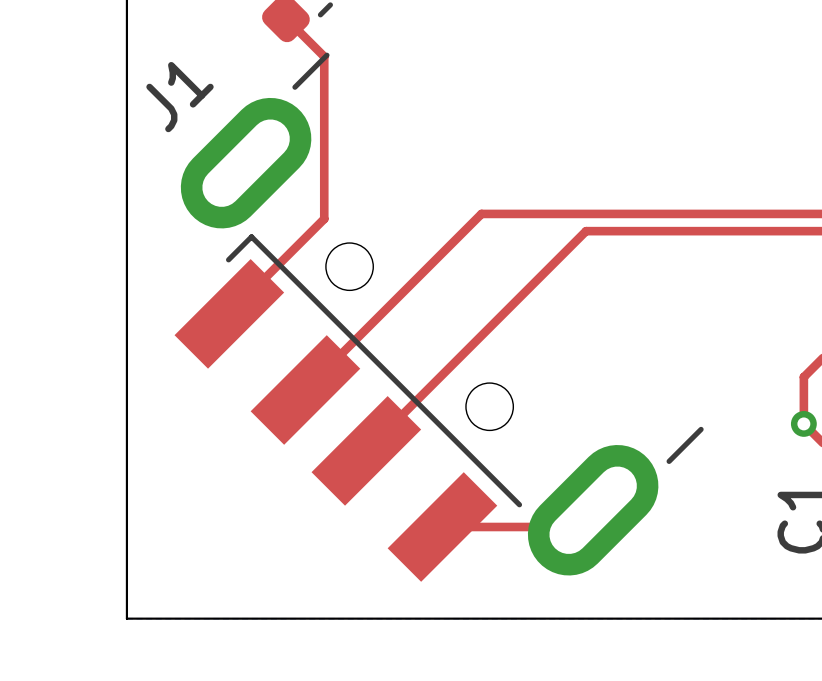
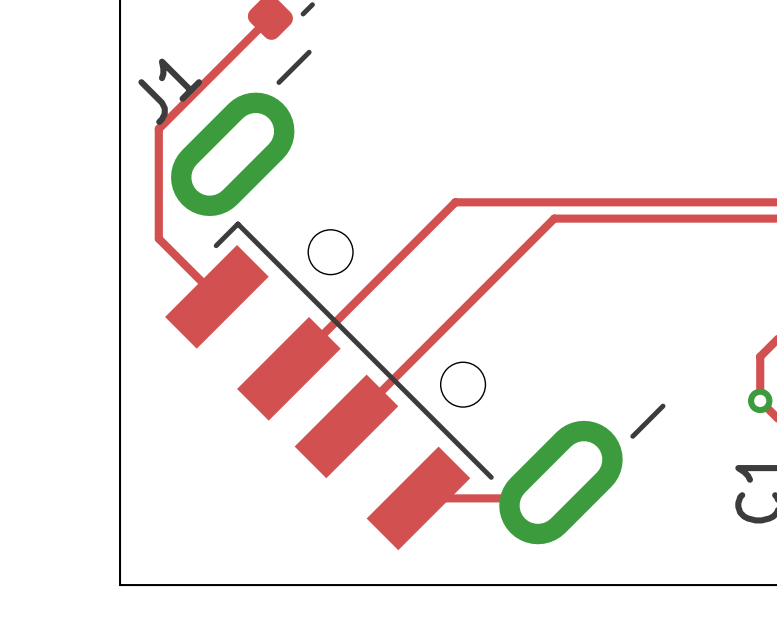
top track: (285, 18) (324, 56) (324, 218) (229, 313) -> (270, 17) (158, 128) (158, 238) (216, 296)

